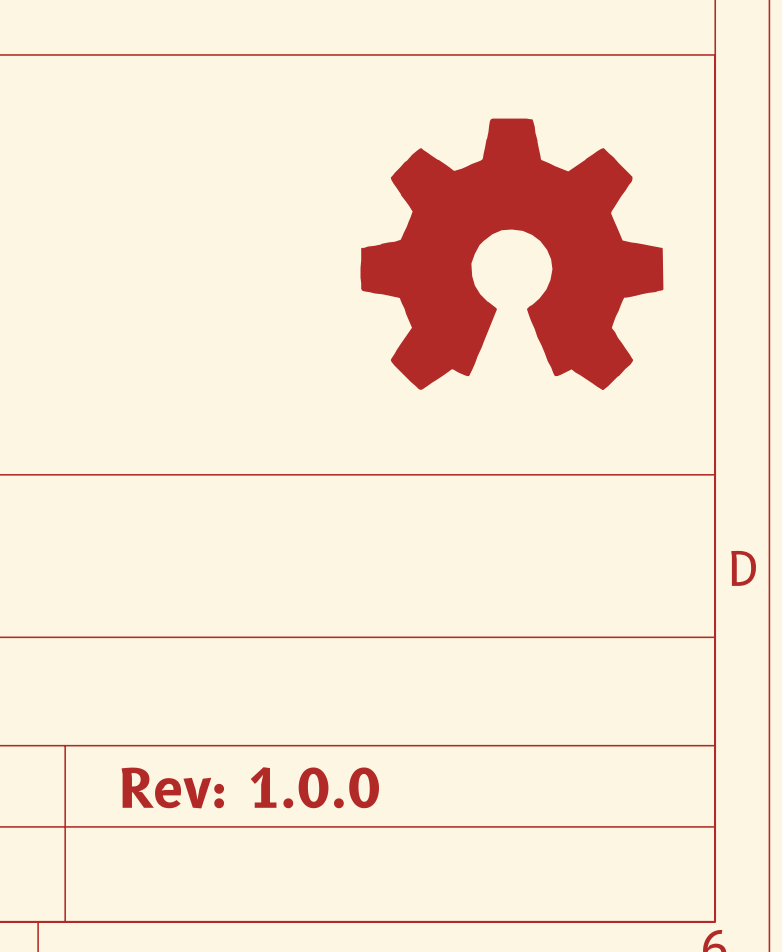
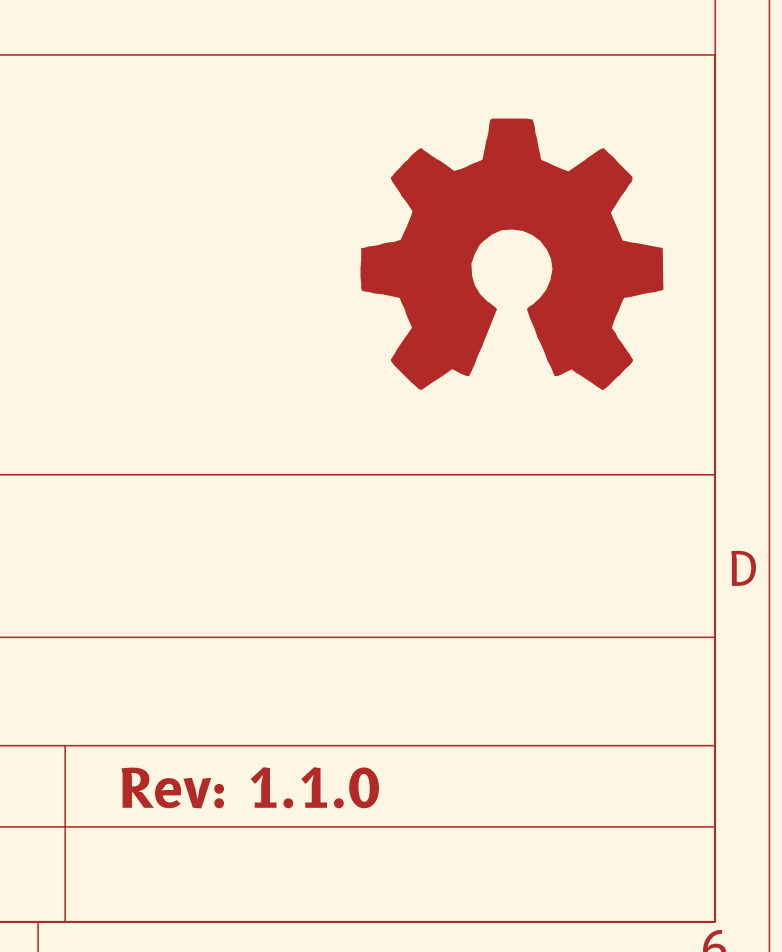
title block: Rev: 1.0.0 (250, 787) -> Rev: 1.1.0 (250, 787)

